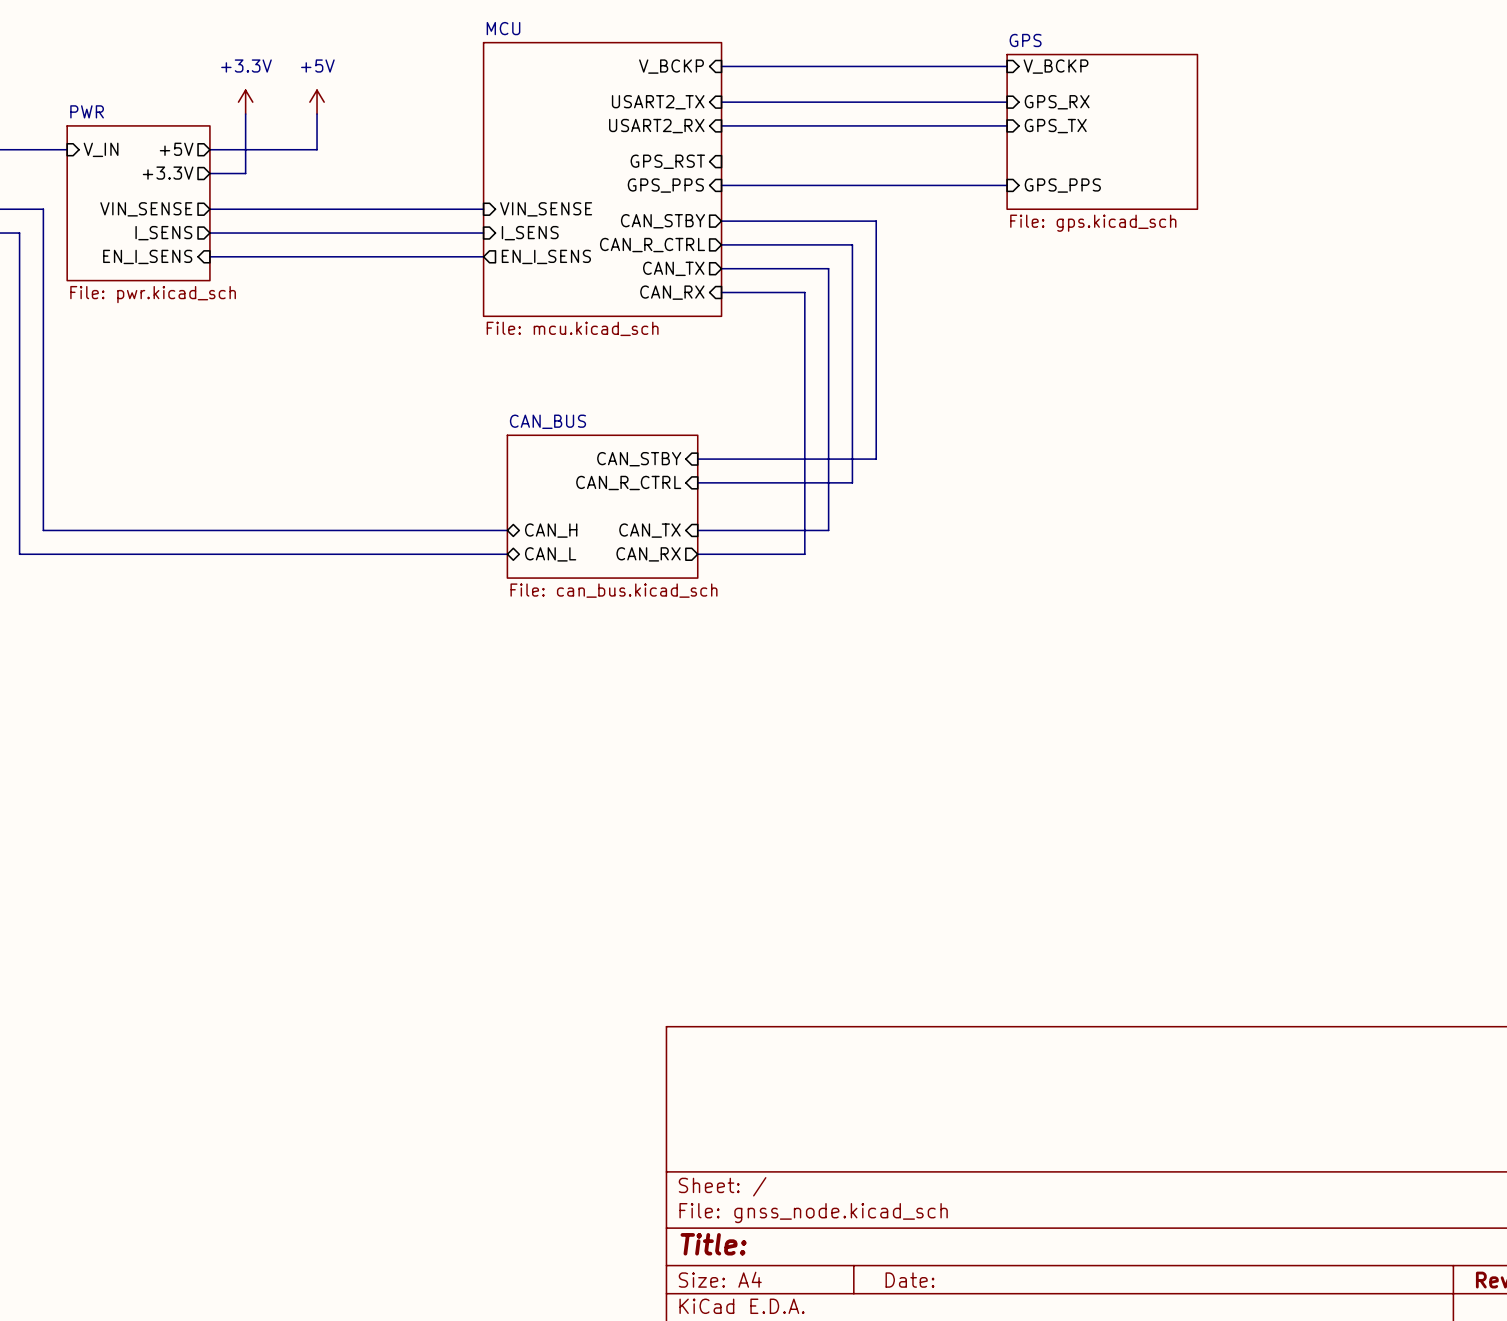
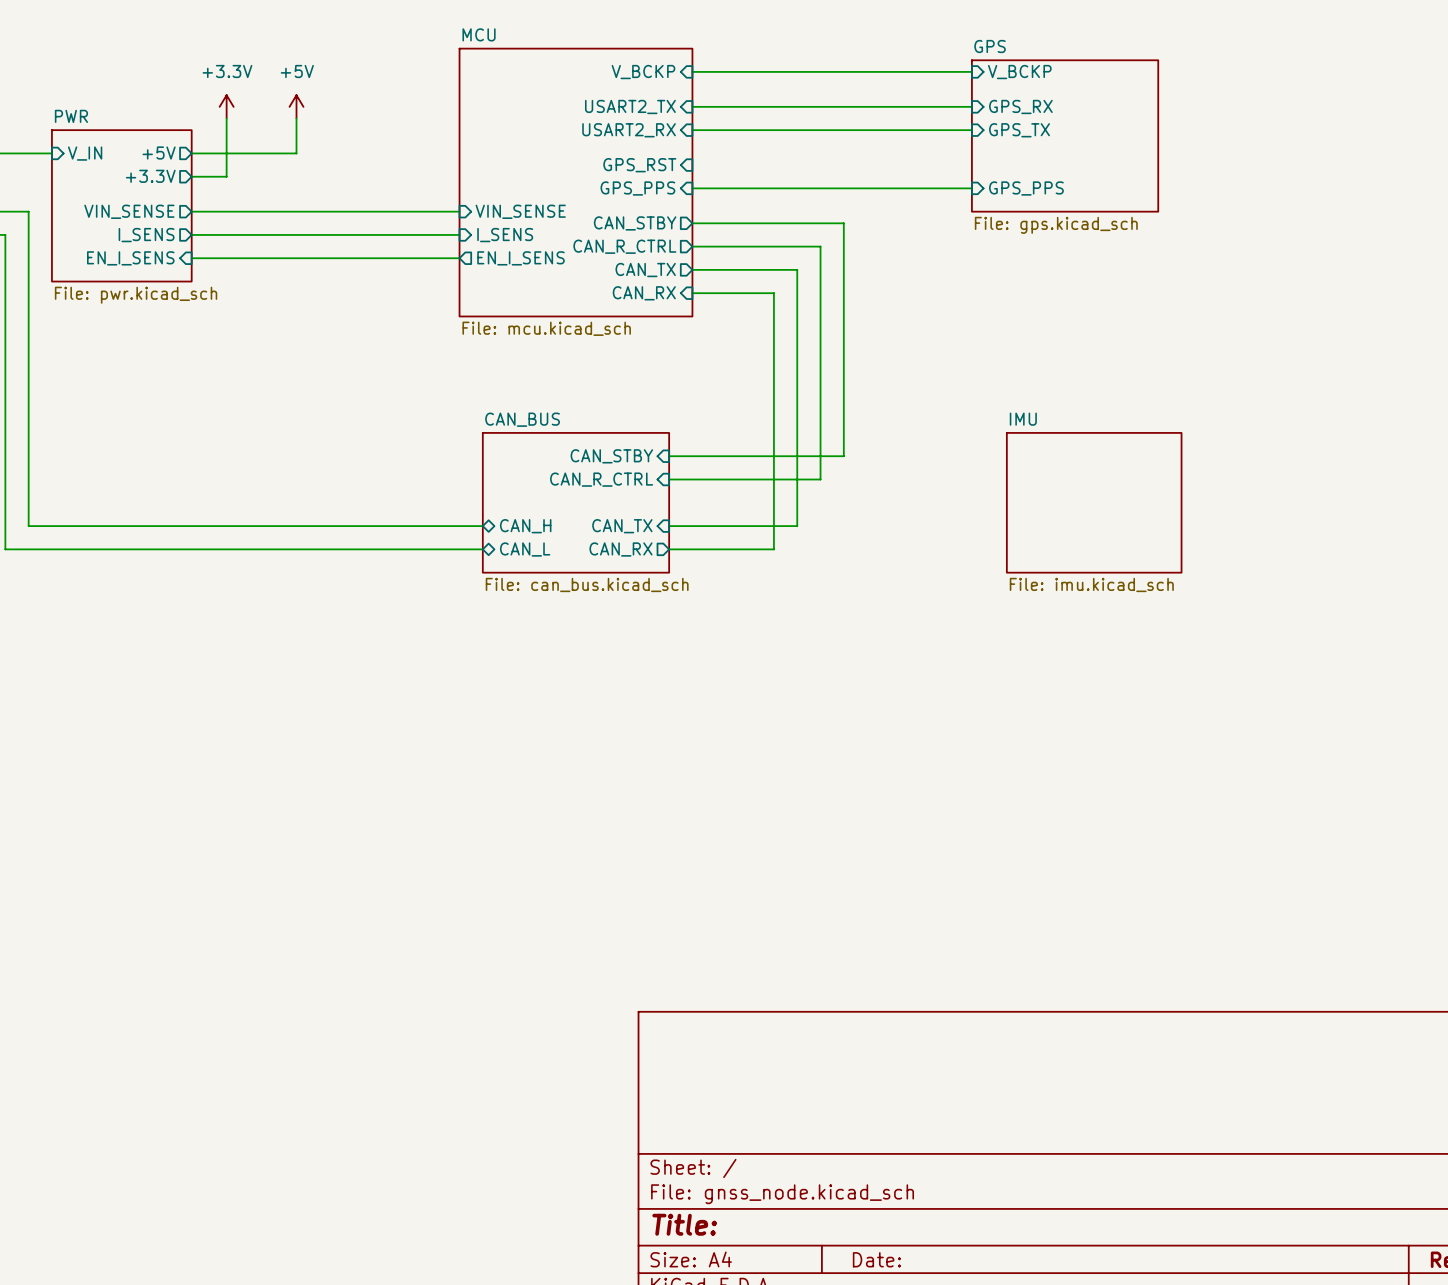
sheet IMU: none -> File: imu.kicad_sch (1094, 502)

